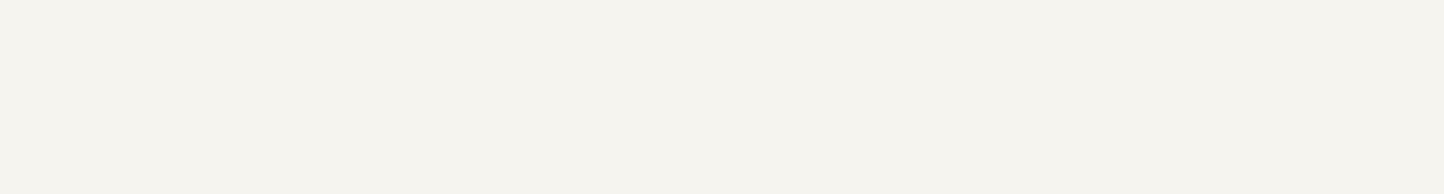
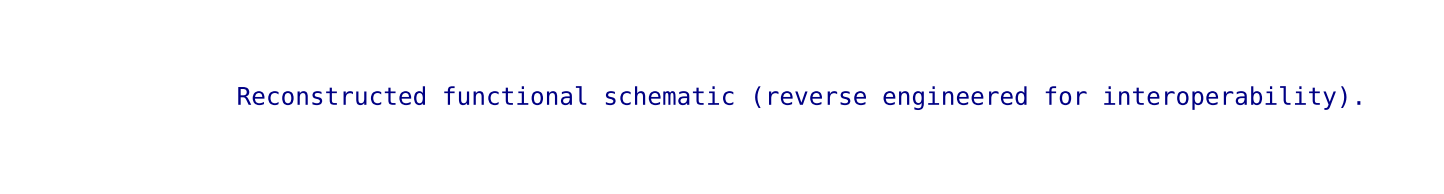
text: none -> Reconstructed functional schematic (reverse engineered for interoperability). (799, 98)

